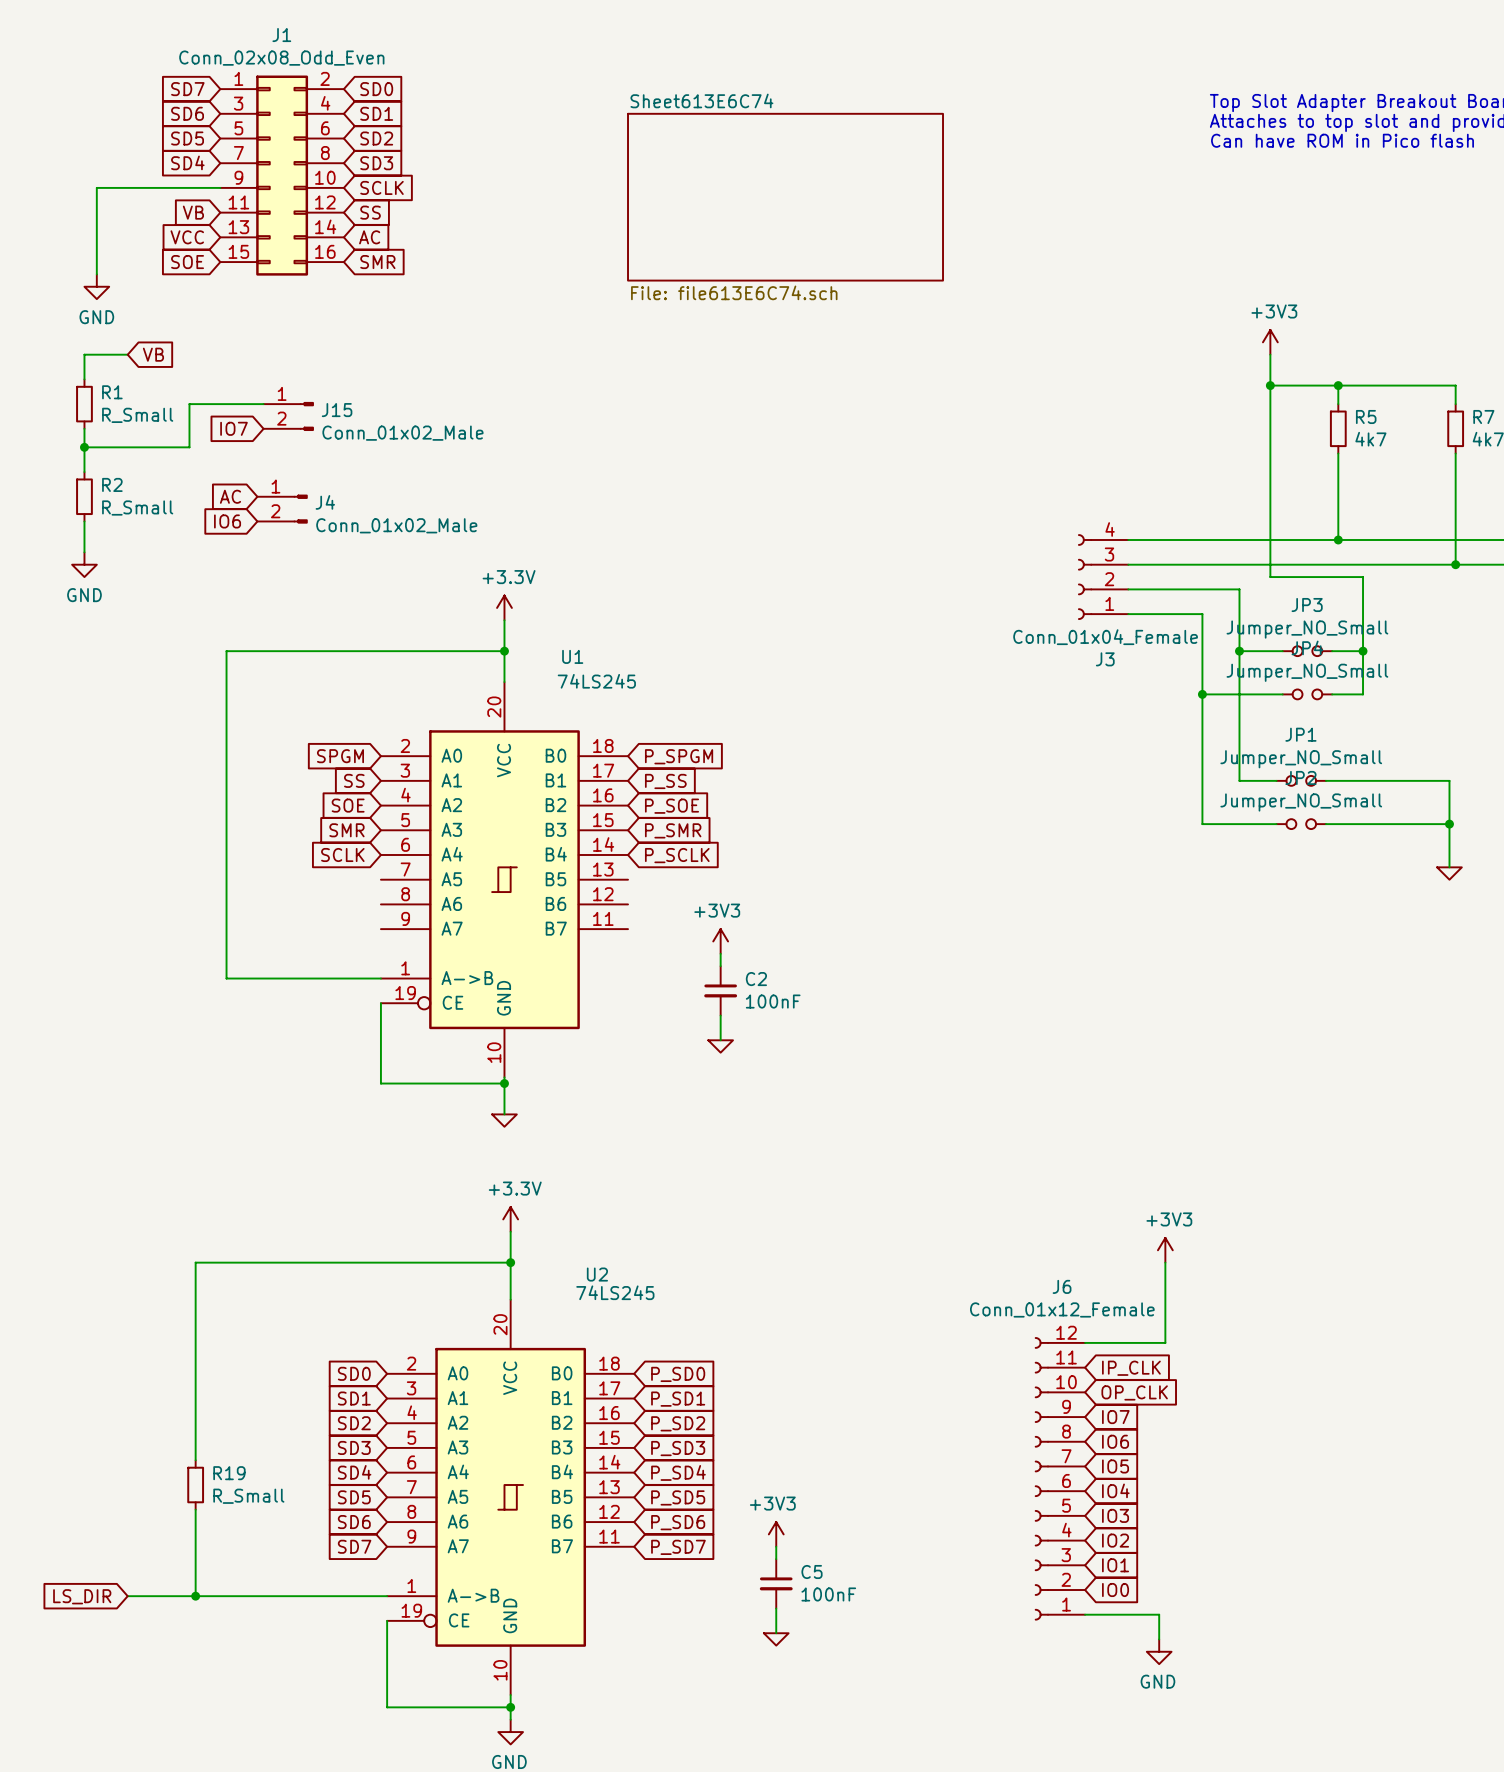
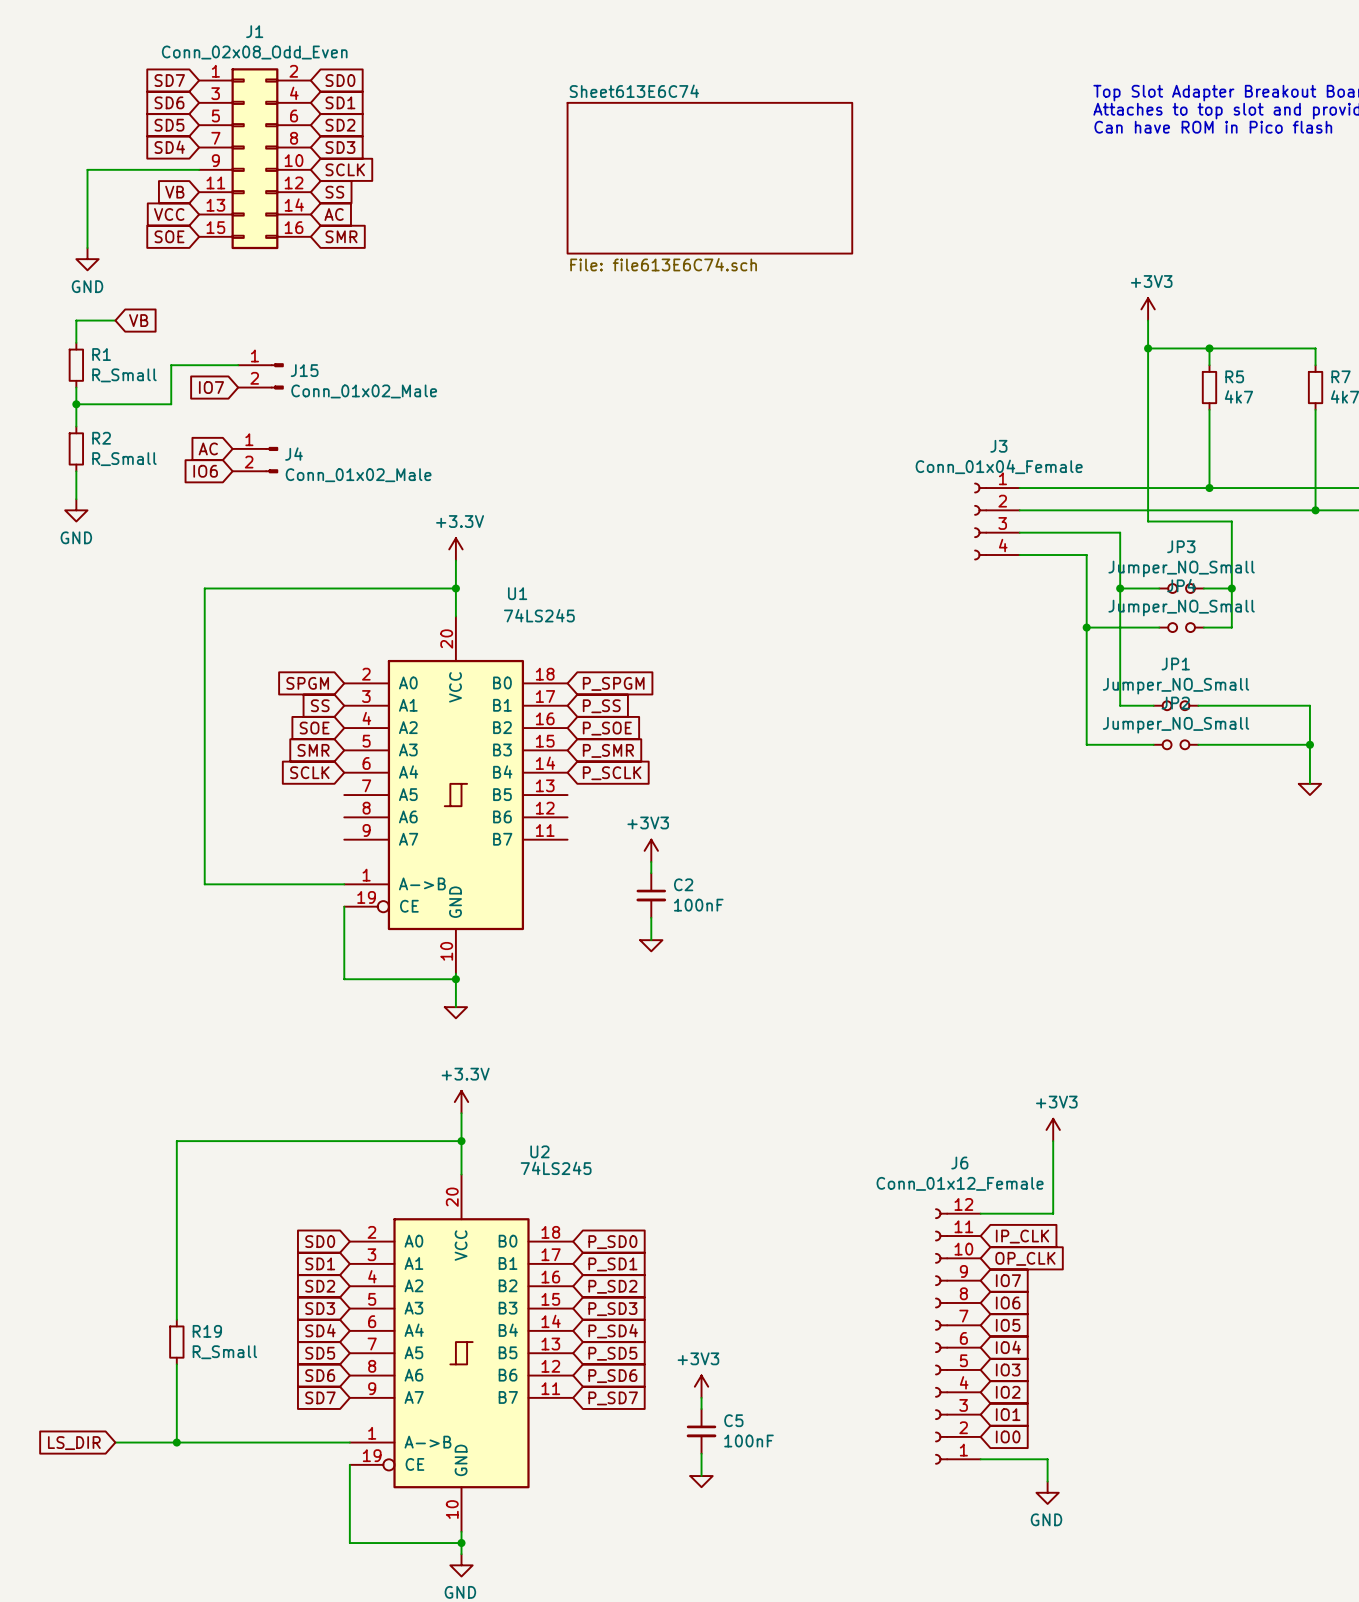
J3 flip: as is (1085, 577) -> up-down (980, 521)

